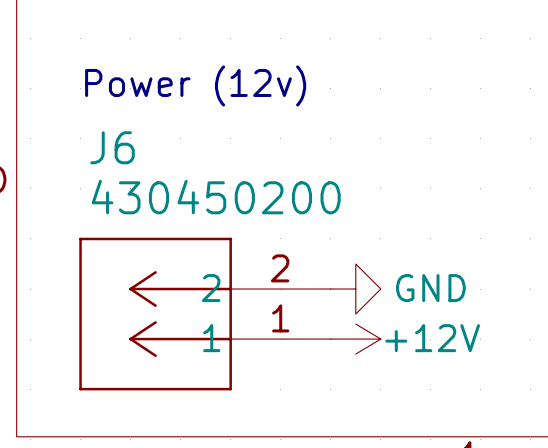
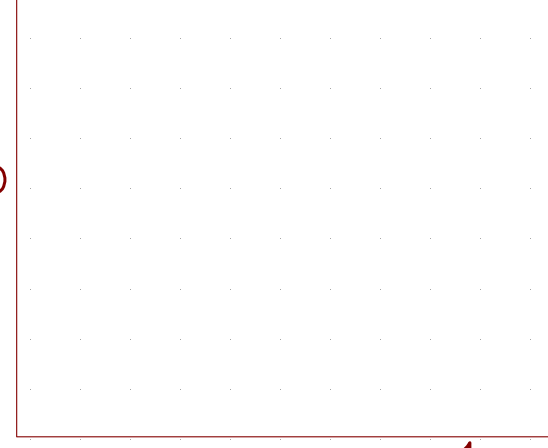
text: Power (12v) (195, 85) -> none
power symbol: GND (355, 289) -> none
J6: 430450200 (205, 314) -> none
power symbol: +12V (355, 339) -> none

